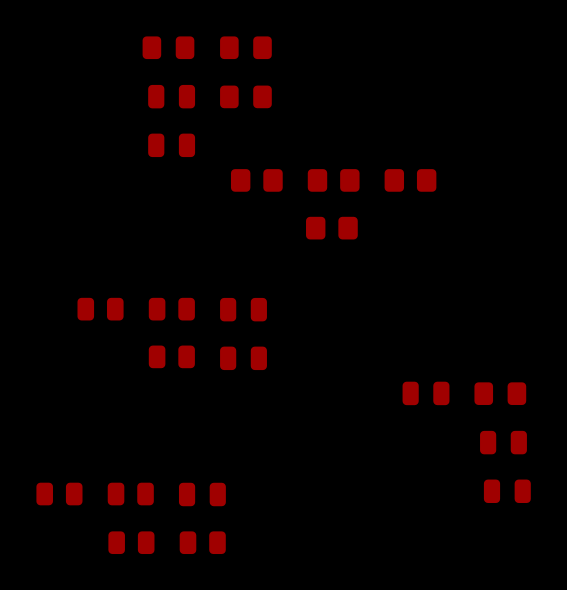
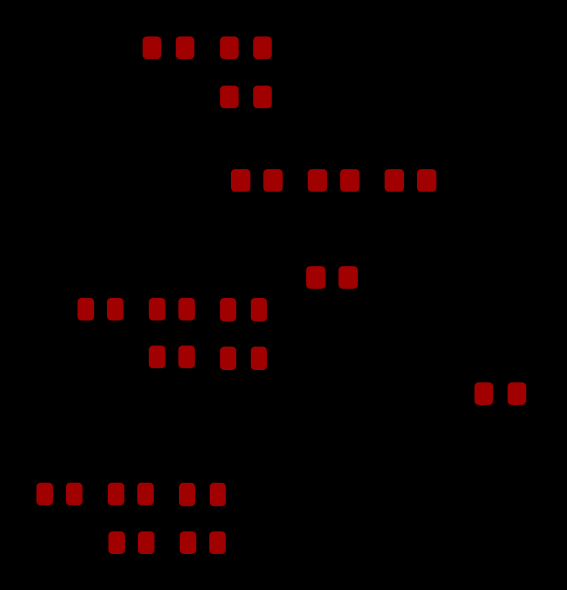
part: (171, 96) -> none
part: (171, 145) -> none
part position: (331, 228) -> (331, 277)
part: (426, 393) -> none
part: (503, 442) -> none
part: (507, 491) -> none

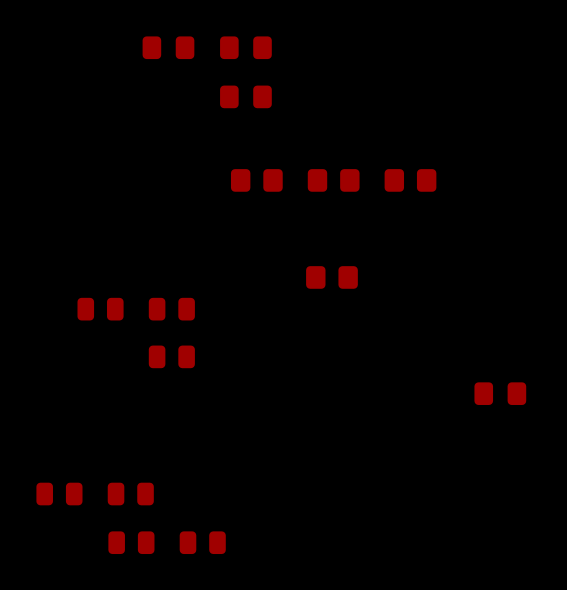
part: (243, 309) -> none
part: (243, 358) -> none
part: (202, 494) -> none

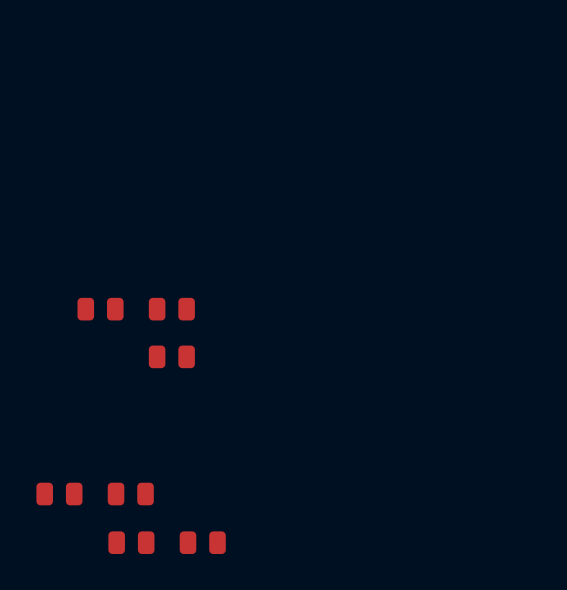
part: (168, 47) -> none
part: (245, 47) -> none
part: (245, 96) -> none
part: (256, 180) -> none
part: (333, 180) -> none
part: (410, 180) -> none
part: (331, 277) -> none
part: (500, 393) -> none

